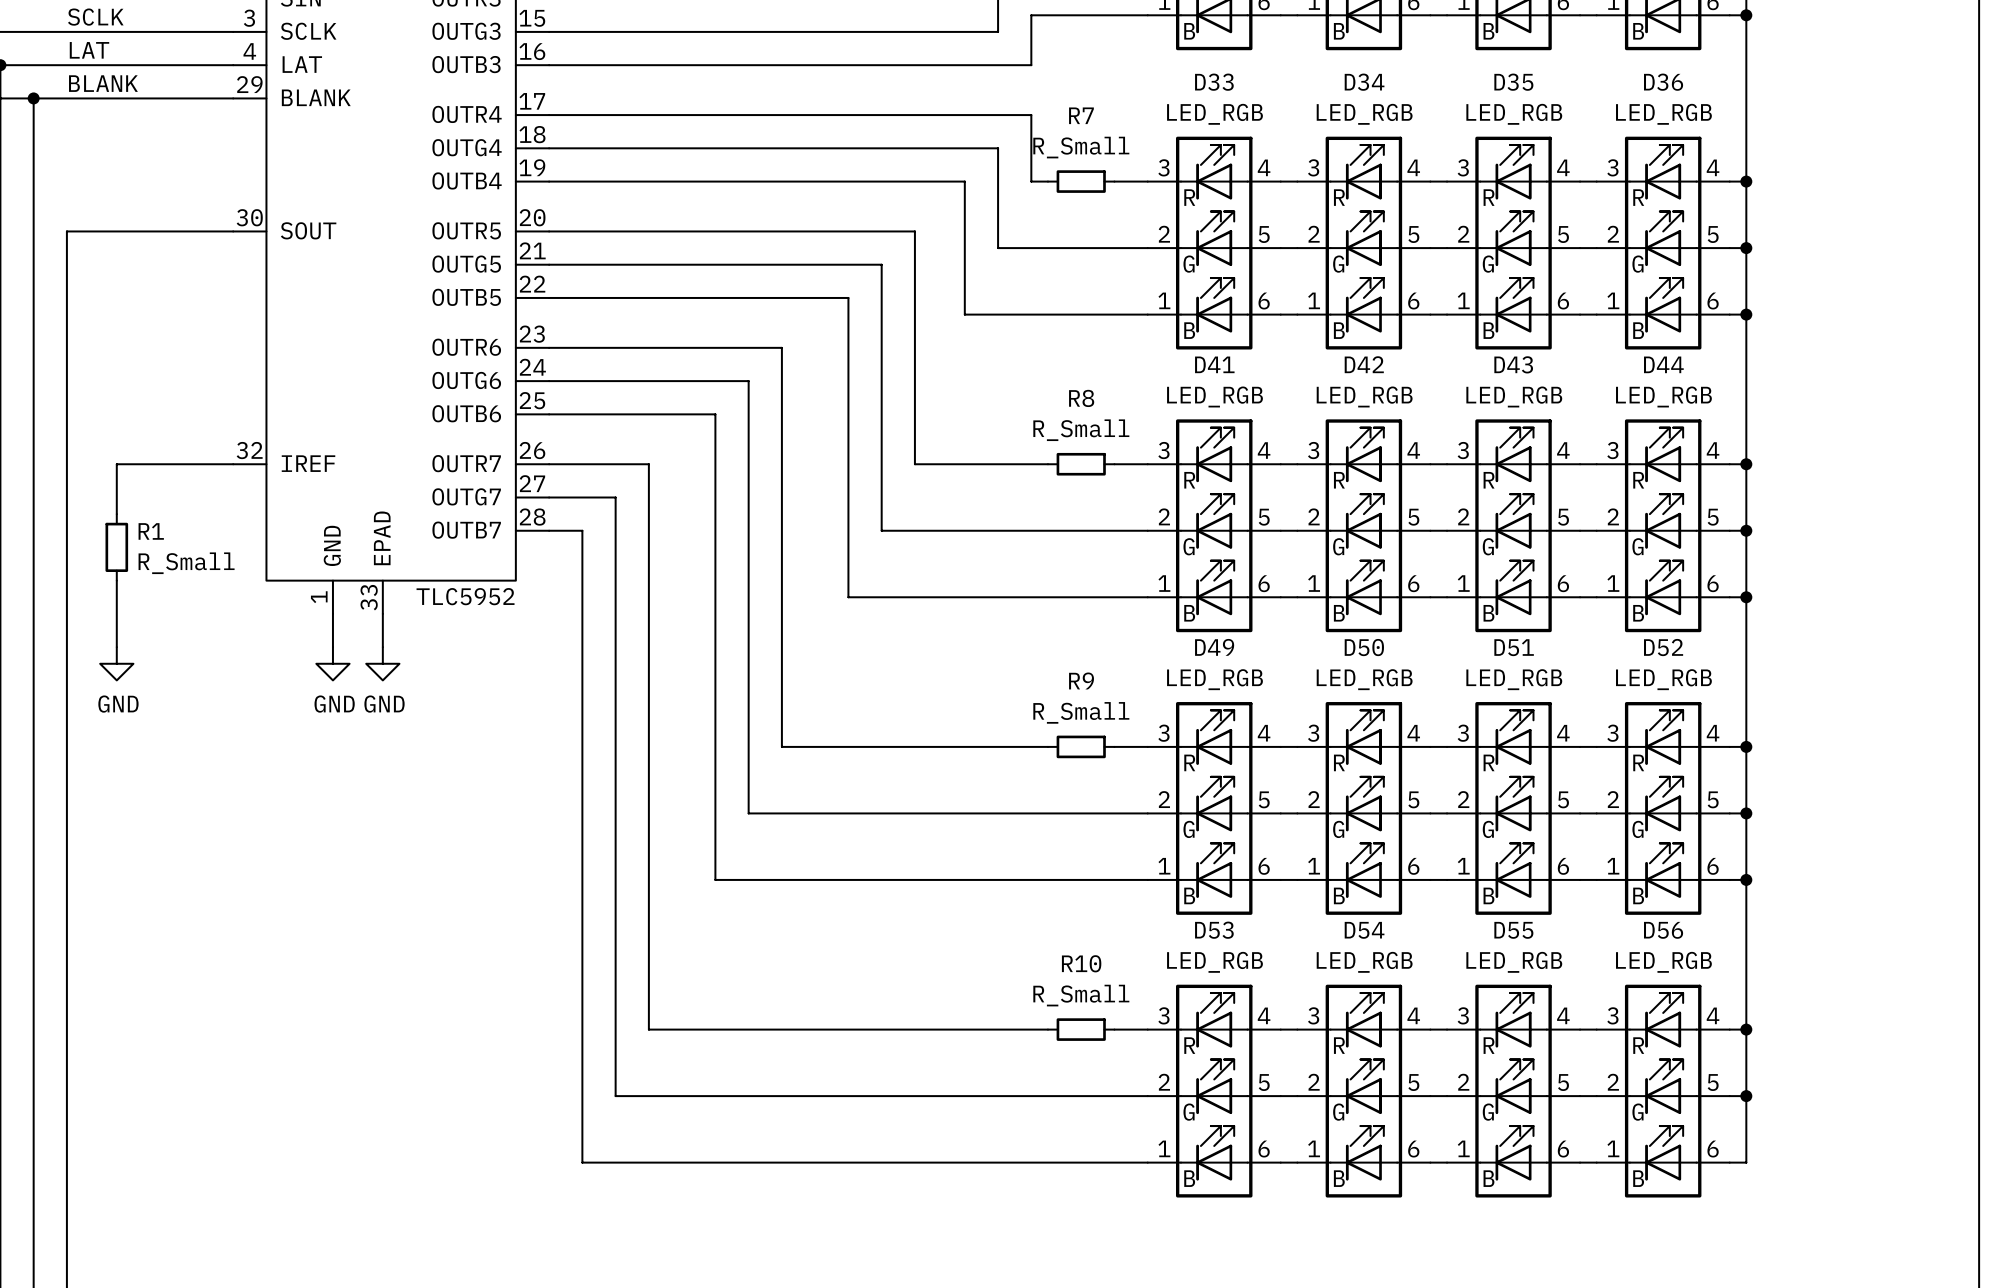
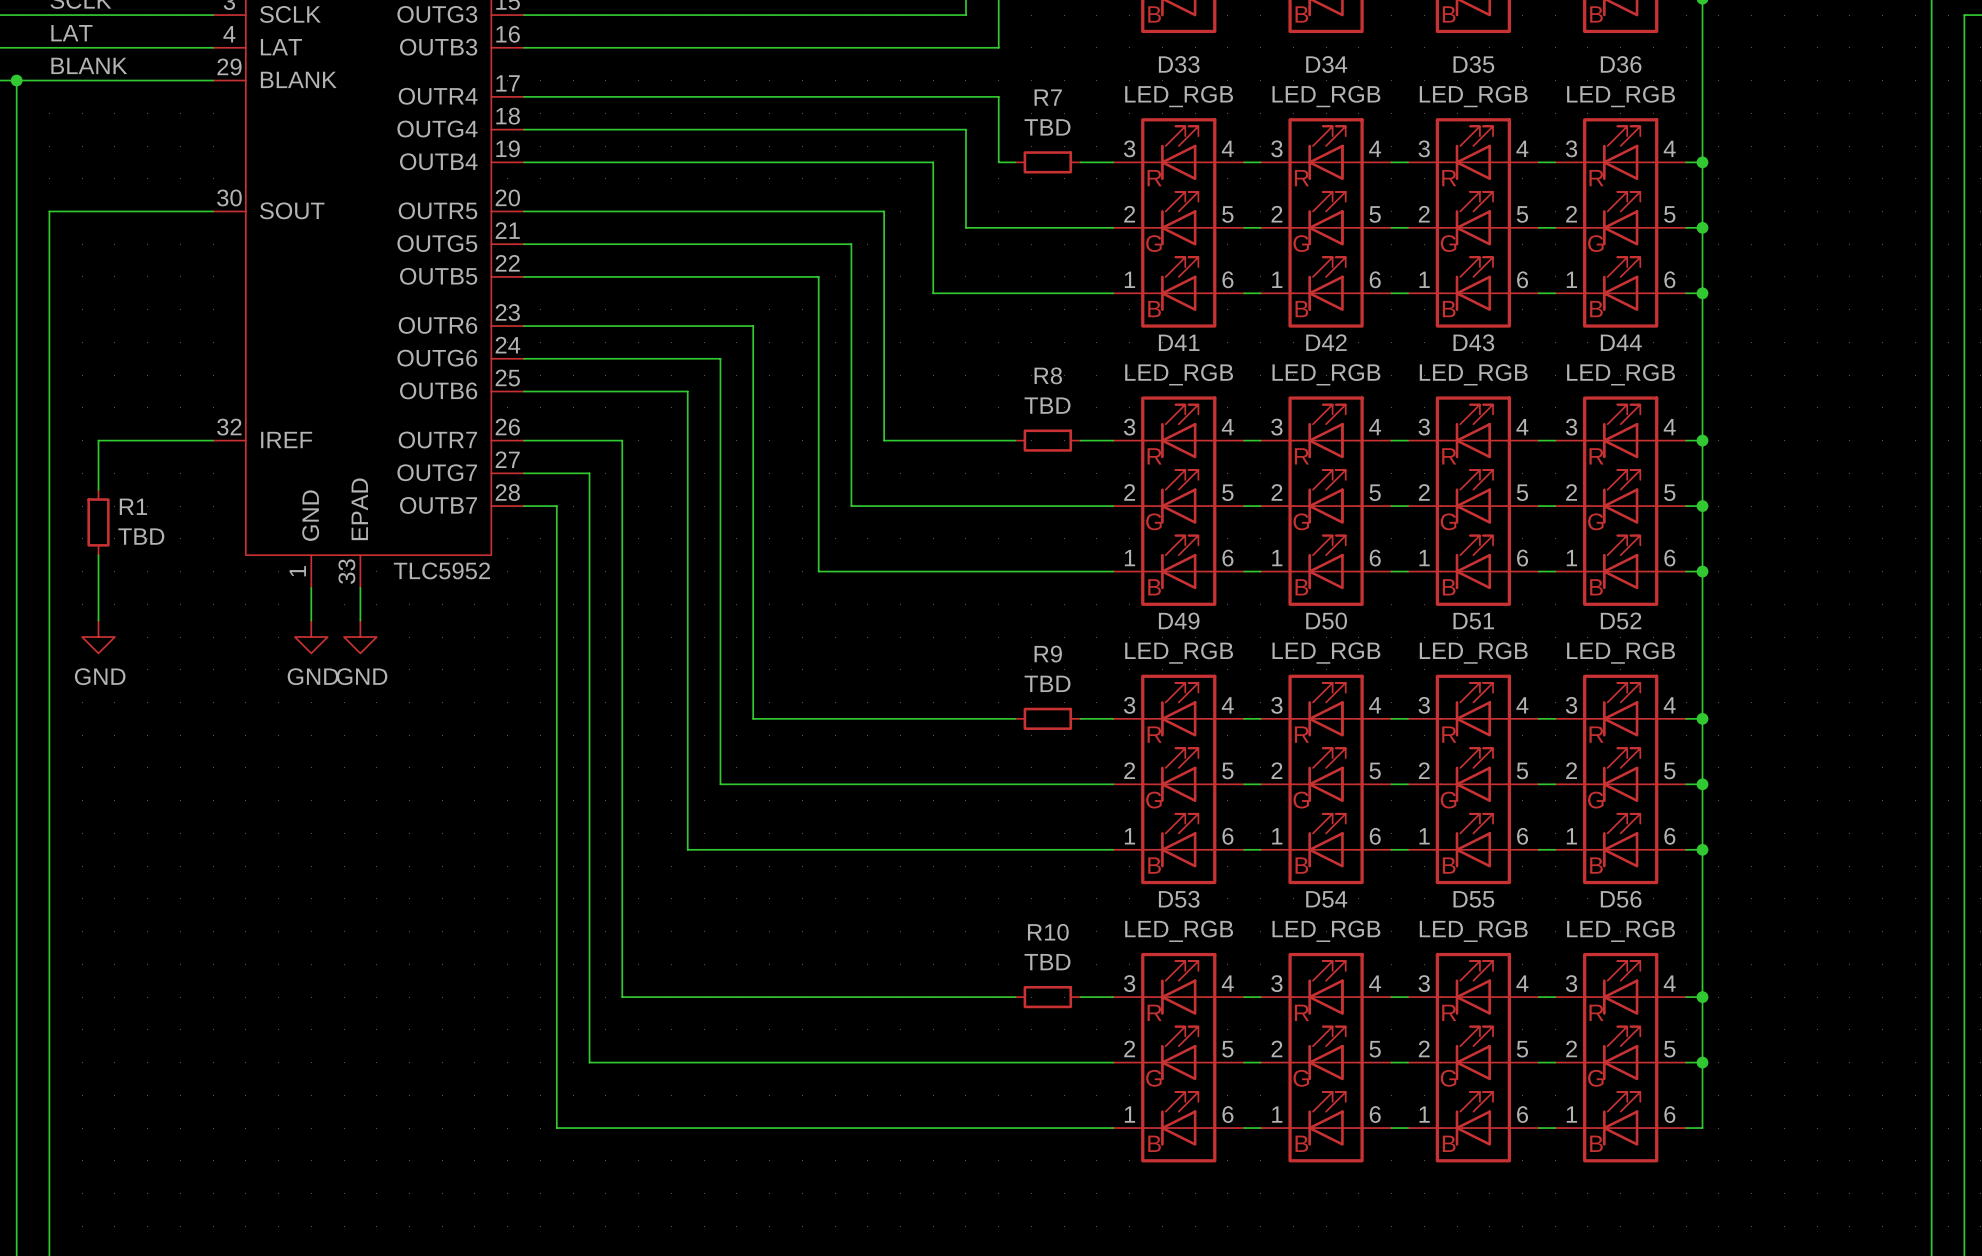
R7 value: R_Small (1081, 147) -> TBD (1047, 127)
R8 value: R_Small (1081, 430) -> TBD (1047, 405)
R1 value: R_Small (186, 563) -> TBD (141, 536)
R9 value: R_Small (1081, 712) -> TBD (1047, 683)
R10 value: R_Small (1081, 995) -> TBD (1047, 962)

